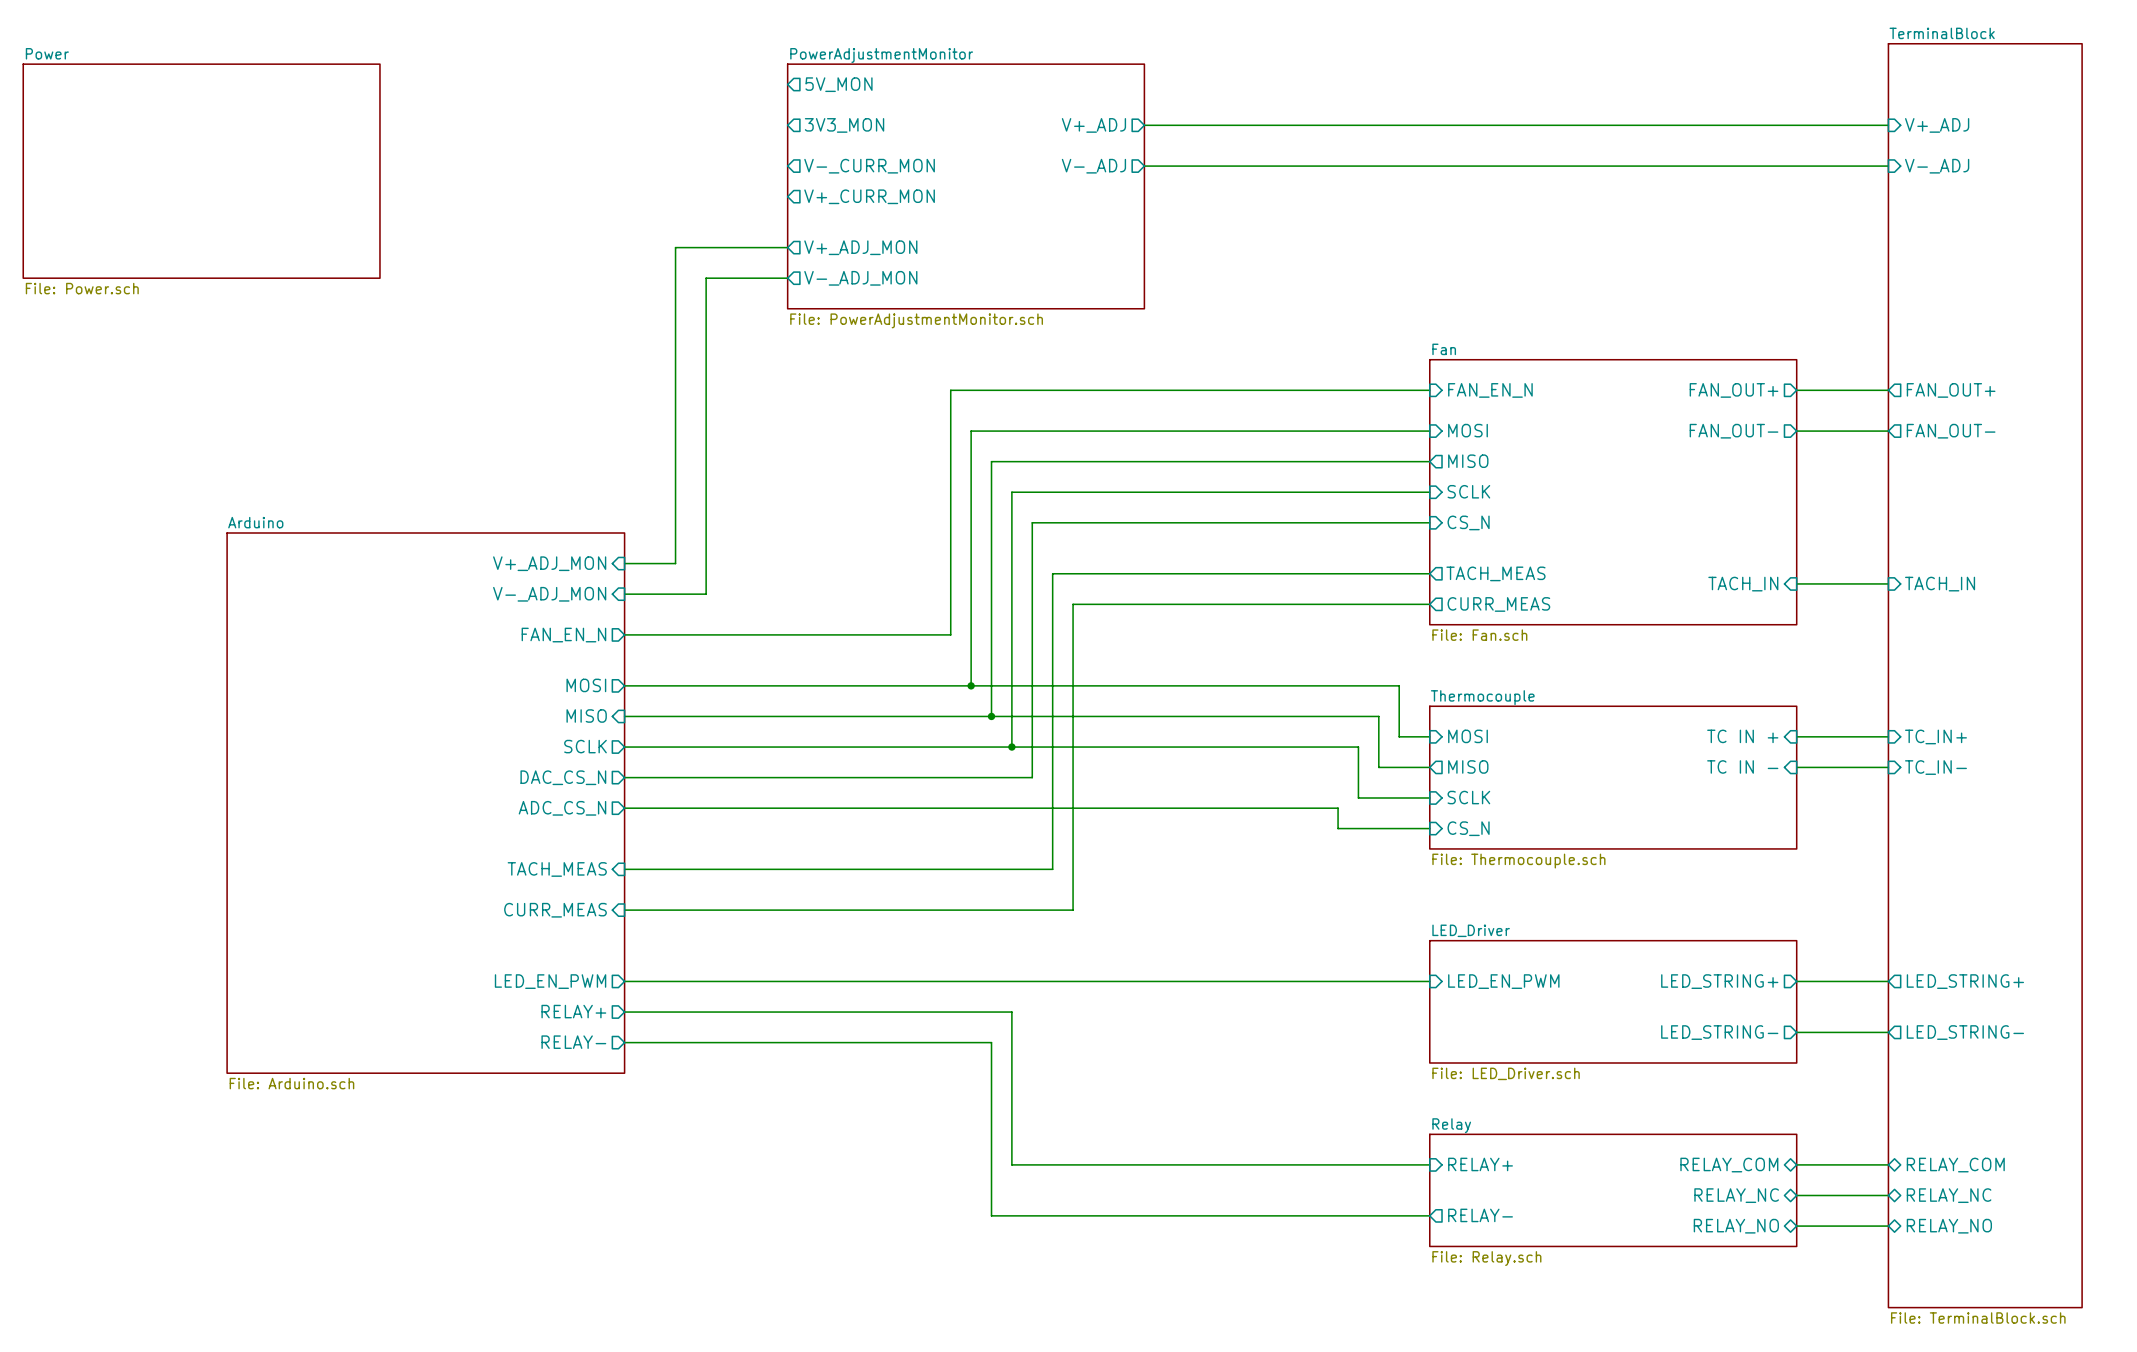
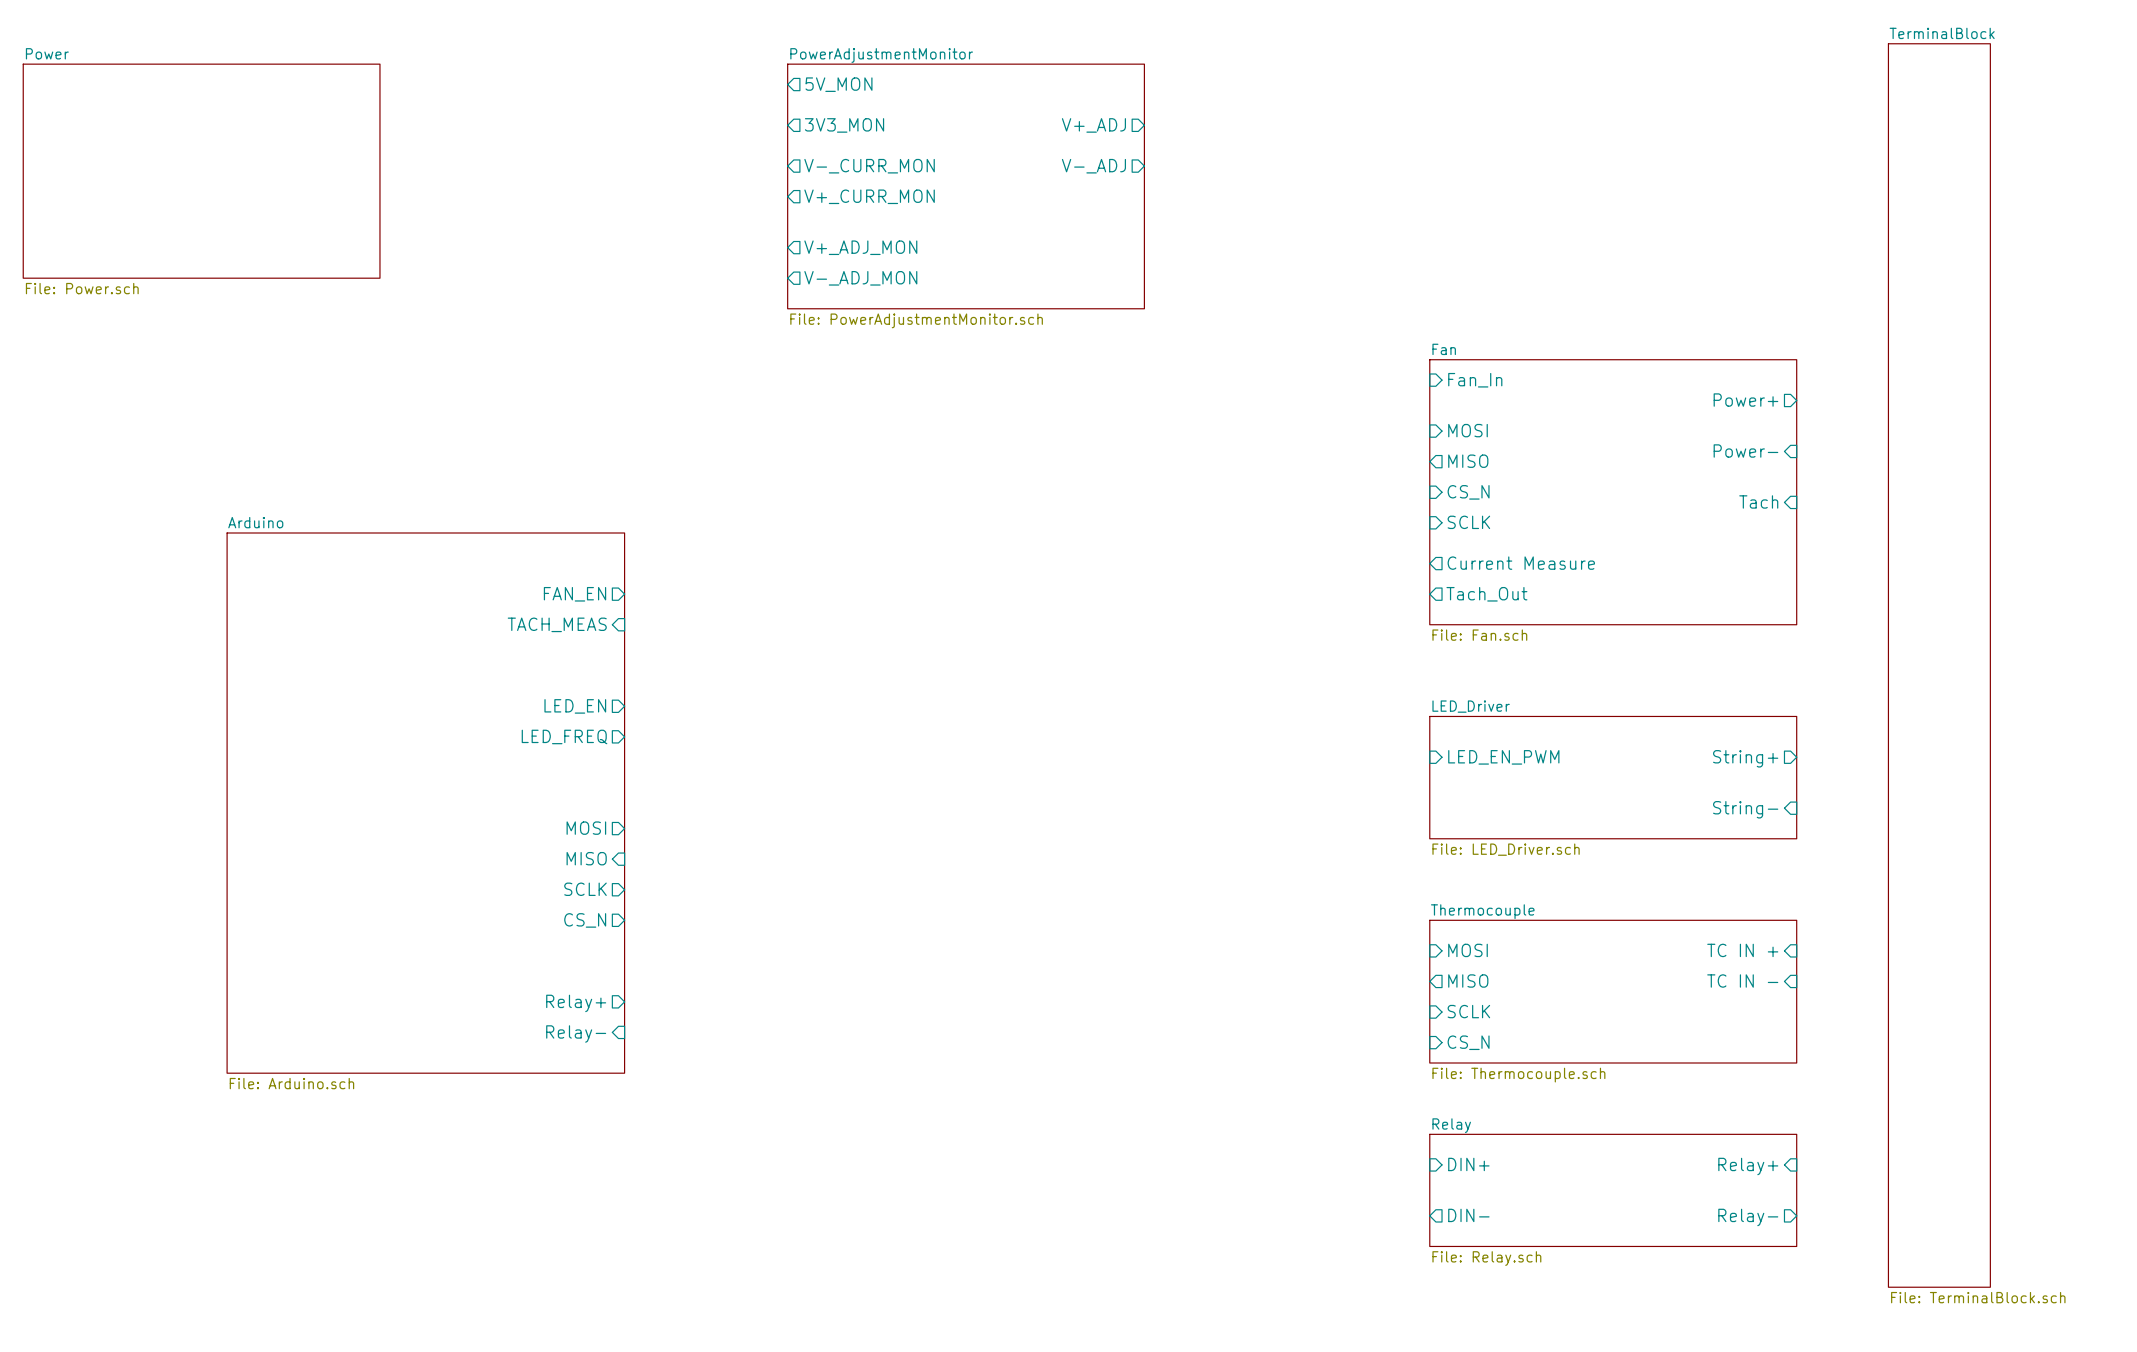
wire: (1144, 125) (1888, 125) -> none
sheet pin: V+_ADJ (1937, 125) -> none
wire: (1144, 166) (1888, 166) -> none
sheet pin: V-_ADJ (1937, 166) -> none
wire: (787, 247) (675, 247) (675, 563) (624, 563) -> none
wire: (787, 278) (706, 278) (706, 594) (624, 594) -> none
sheet pin: none -> Fan_In (1475, 380)
wire: (1429, 390) (950, 390) (950, 634) (624, 634) -> none
sheet pin: FAN_EN_N (1490, 390) -> none
sheet pin: FAN_OUT+ (1734, 390) -> none
wire: (1796, 390) (1888, 390) -> none
sheet pin: FAN_OUT+ (1951, 390) -> none
sheet pin: none -> Power+ (1745, 400)
wire: (1429, 431) (971, 431) (971, 685) -> none
sheet pin: FAN_OUT- (1734, 431) -> none
wire: (1796, 431) (1888, 431) -> none
sheet pin: FAN_OUT- (1951, 431) -> none
sheet pin: none -> Power- (1745, 451)
wire: (1429, 461) (991, 461) (991, 716) -> none
sheet pin: SCLK (1468, 491) -> CS_N (1468, 492)
wire: (1429, 492) (1011, 492) (1011, 747) -> none
sheet pin: none -> Tach (1758, 501)
wire: (1429, 522) (1032, 522) (1032, 777) (624, 777) -> none
sheet pin: CS_N (1468, 522) -> SCLK (1468, 522)
sheet pin: V+_ADJ_MON (549, 563) -> none
sheet pin: none -> Current Measure (1521, 563)
wire: (1429, 573) (1052, 573) (1052, 869) (624, 869) -> none
sheet pin: TACH_MEAS (1495, 573) -> none
wire: (1796, 583) (1888, 583) -> none
sheet pin: TACH_IN (1743, 584) -> none
sheet pin: TACH_IN (1940, 584) -> none
sheet pin shape: input (549, 594) -> output (575, 594)
sheet pin: V-_ADJ_MON (549, 594) -> FAN_EN (575, 594)
sheet pin: none -> Tach_Out (1486, 594)
wire: (1429, 604) (1073, 604) (1073, 910) (624, 910) -> none
sheet pin: CURR_MEAS (1498, 604) -> none
sheet pin: none -> TACH_MEAS (557, 624)
sheet pin: FAN_EN_N (563, 635) -> none
sheet TerminalBlock: none -> File: TerminalBlock.sch (1939, 665)
sheet TerminalBlock: File: TerminalBlock.sch (1985, 675) -> none
sheet pin position: MOSI (586, 685) -> MOSI (586, 828)
wire: (624, 685) (1399, 685) (1399, 736) (1429, 736) -> none
junction: (971, 685) -> none
sheet pin: none -> LED_EN (575, 706)
sheet pin position: MISO (586, 716) -> MISO (586, 858)
wire: (624, 716) (1378, 716) (1378, 767) (1429, 767) -> none
junction: (991, 716) -> none
sheet pin: none -> LED_FREQ (564, 736)
sheet pin: MOSI (1468, 736) -> none
sheet pin: TC IN + (1742, 736) -> none
wire: (1796, 736) (1888, 736) -> none
sheet pin: TC_IN+ (1935, 736) -> none
sheet pin position: SCLK (585, 746) -> SCLK (585, 889)
wire: (624, 747) (1358, 747) (1358, 797) (1429, 797) -> none
junction: (1011, 747) -> none
sheet pin: none -> LED_EN_PWM (1503, 757)
sheet pin: none -> String+ (1745, 758)
sheet pin: MISO (1468, 766) -> none
sheet pin: TC IN - (1742, 766) -> none
wire: (1796, 767) (1888, 767) -> none
sheet pin: TC_IN- (1935, 767) -> none
sheet pin: DAC_CS_N (563, 777) -> none
sheet Thermocouple: File: Thermocouple.sch (1613, 777) -> none
sheet LED_Driver: none -> File: LED_Driver.sch (1613, 777)
sheet pin: SCLK (1468, 797) -> none
sheet pin: ADC_CS_N (562, 808) -> none
wire: (624, 808) (1338, 808) (1338, 828) (1429, 828) -> none
sheet pin: none -> String- (1745, 809)
sheet pin: CS_N (1468, 828) -> none
sheet pin: TACH_MEAS (557, 869) -> none
sheet pin: CURR_MEAS (555, 910) -> none
sheet pin: none -> CS_N (585, 920)
sheet pin: none -> MOSI (1468, 950)
sheet pin: none -> TC IN + (1742, 950)
sheet pin: LED_EN_PWM (550, 981) -> none
wire: (624, 981) (1429, 981) -> none
sheet pin shape: input (1503, 981) -> output (1468, 981)
sheet pin: LED_EN_PWM (1503, 981) -> MISO (1468, 981)
sheet pin shape: output (1719, 981) -> input (1742, 981)
sheet pin: LED_STRING+ (1719, 981) -> TC IN - (1742, 981)
wire: (1796, 981) (1888, 981) -> none
sheet pin: LED_STRING+ (1965, 981) -> none
sheet Thermocouple: none -> File: Thermocouple.sch (1613, 991)
sheet LED_Driver: File: LED_Driver.sch (1613, 1001) -> none
sheet pin: none -> Relay+ (576, 1003)
sheet pin: RELAY+ (573, 1011) -> none
sheet pin: none -> SCLK (1468, 1011)
wire: (624, 1012) (1011, 1012) (1011, 1164) (1429, 1164) -> none
sheet pin: LED_STRING- (1719, 1032) -> none
wire: (1796, 1032) (1888, 1032) -> none
sheet pin: LED_STRING- (1965, 1032) -> none
sheet pin: none -> Relay- (576, 1034)
sheet pin: RELAY- (573, 1042) -> none
wire: (624, 1042) (991, 1042) (991, 1215) (1429, 1215) -> none
sheet pin: none -> CS_N (1468, 1042)
sheet pin: RELAY+ (1480, 1164) -> DIN+ (1468, 1164)
wire: (1796, 1164) (1888, 1164) -> none
sheet pin shape: bidirectional (1729, 1165) -> input (1748, 1166)
sheet pin: RELAY_COM (1729, 1165) -> Relay+ (1748, 1166)
sheet pin: RELAY_COM (1955, 1165) -> none
sheet pin: RELAY_NC (1736, 1195) -> none
wire: (1796, 1195) (1888, 1195) -> none
sheet pin: RELAY_NC (1949, 1195) -> none
sheet pin: RELAY- (1480, 1215) -> DIN- (1468, 1215)
sheet pin: none -> Relay- (1748, 1217)
sheet pin: RELAY_NO (1736, 1226) -> none
wire: (1796, 1226) (1888, 1226) -> none
sheet pin: RELAY_NO (1949, 1226) -> none

